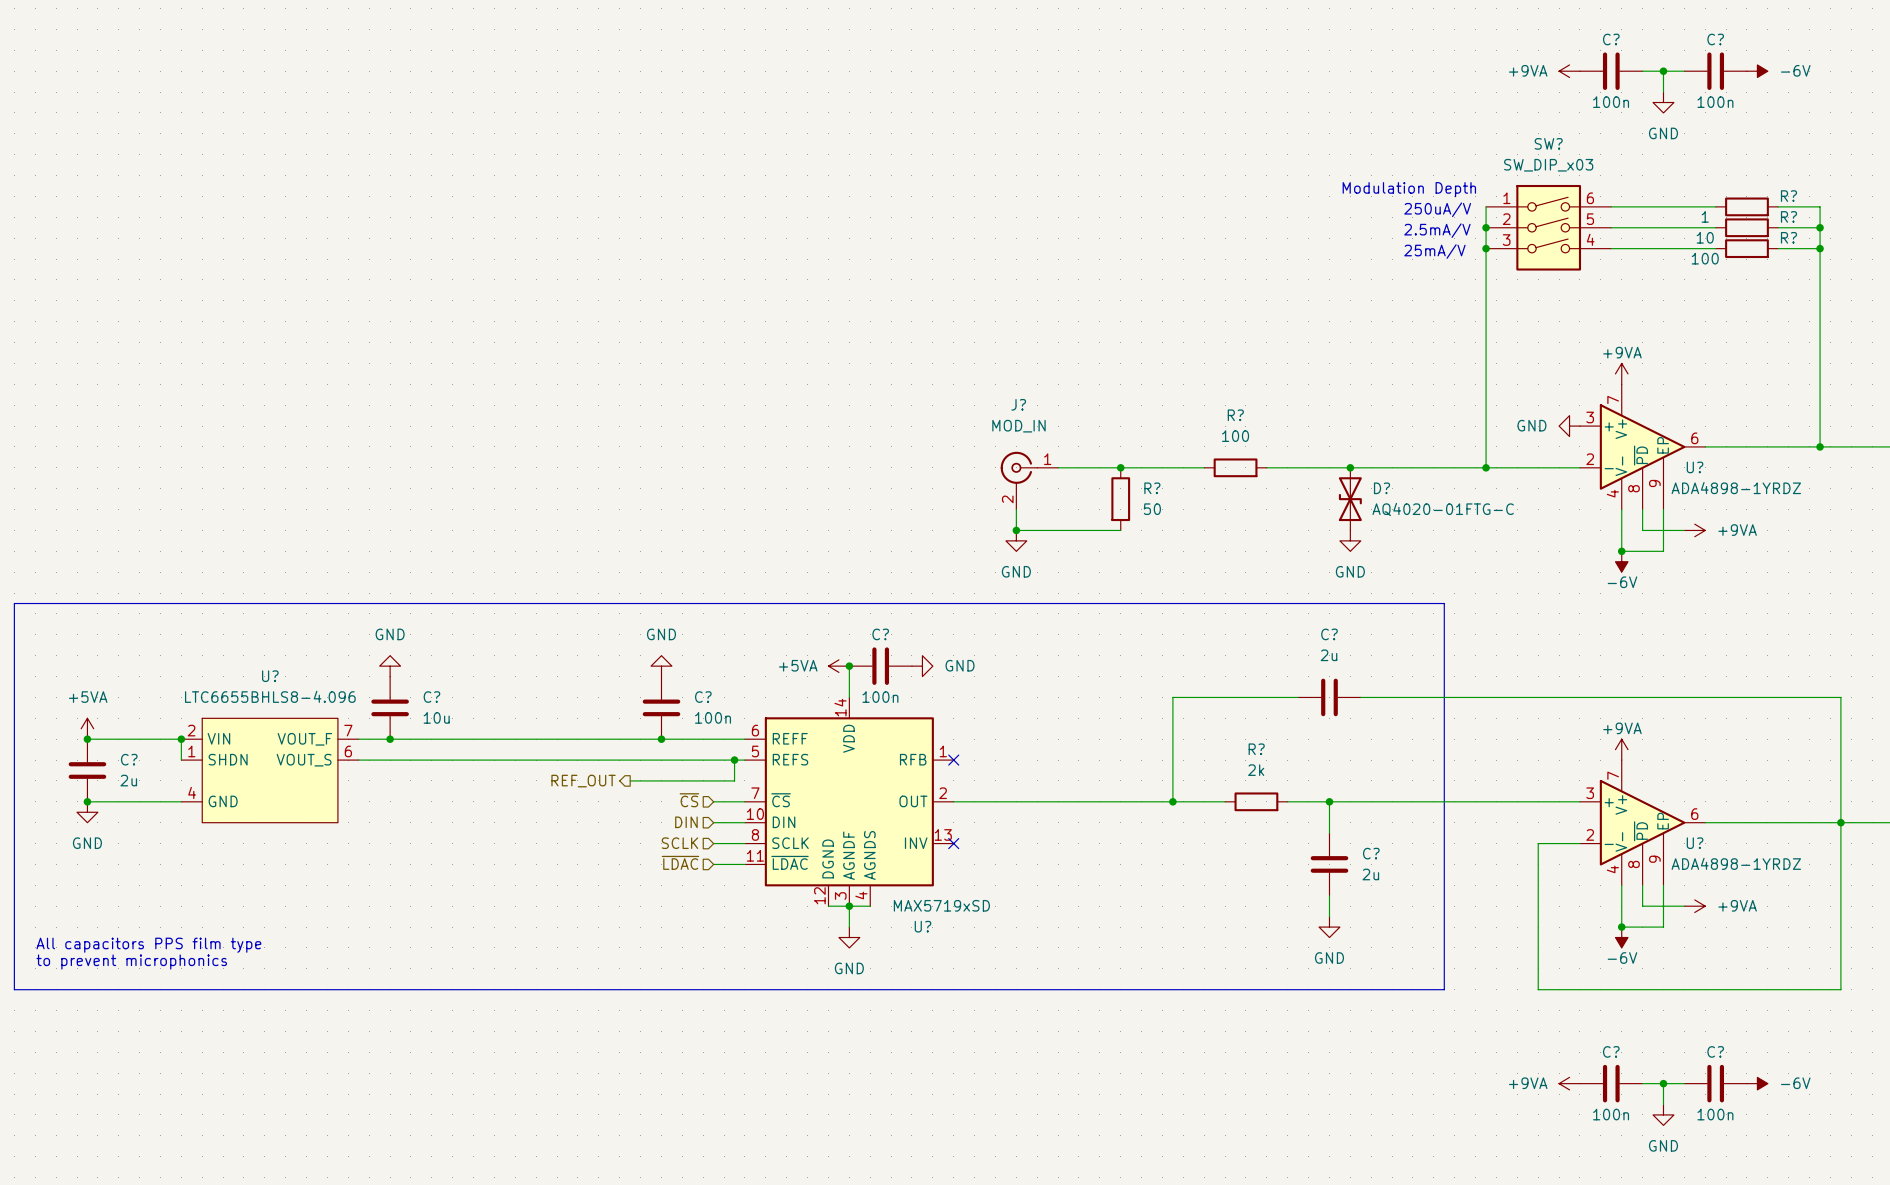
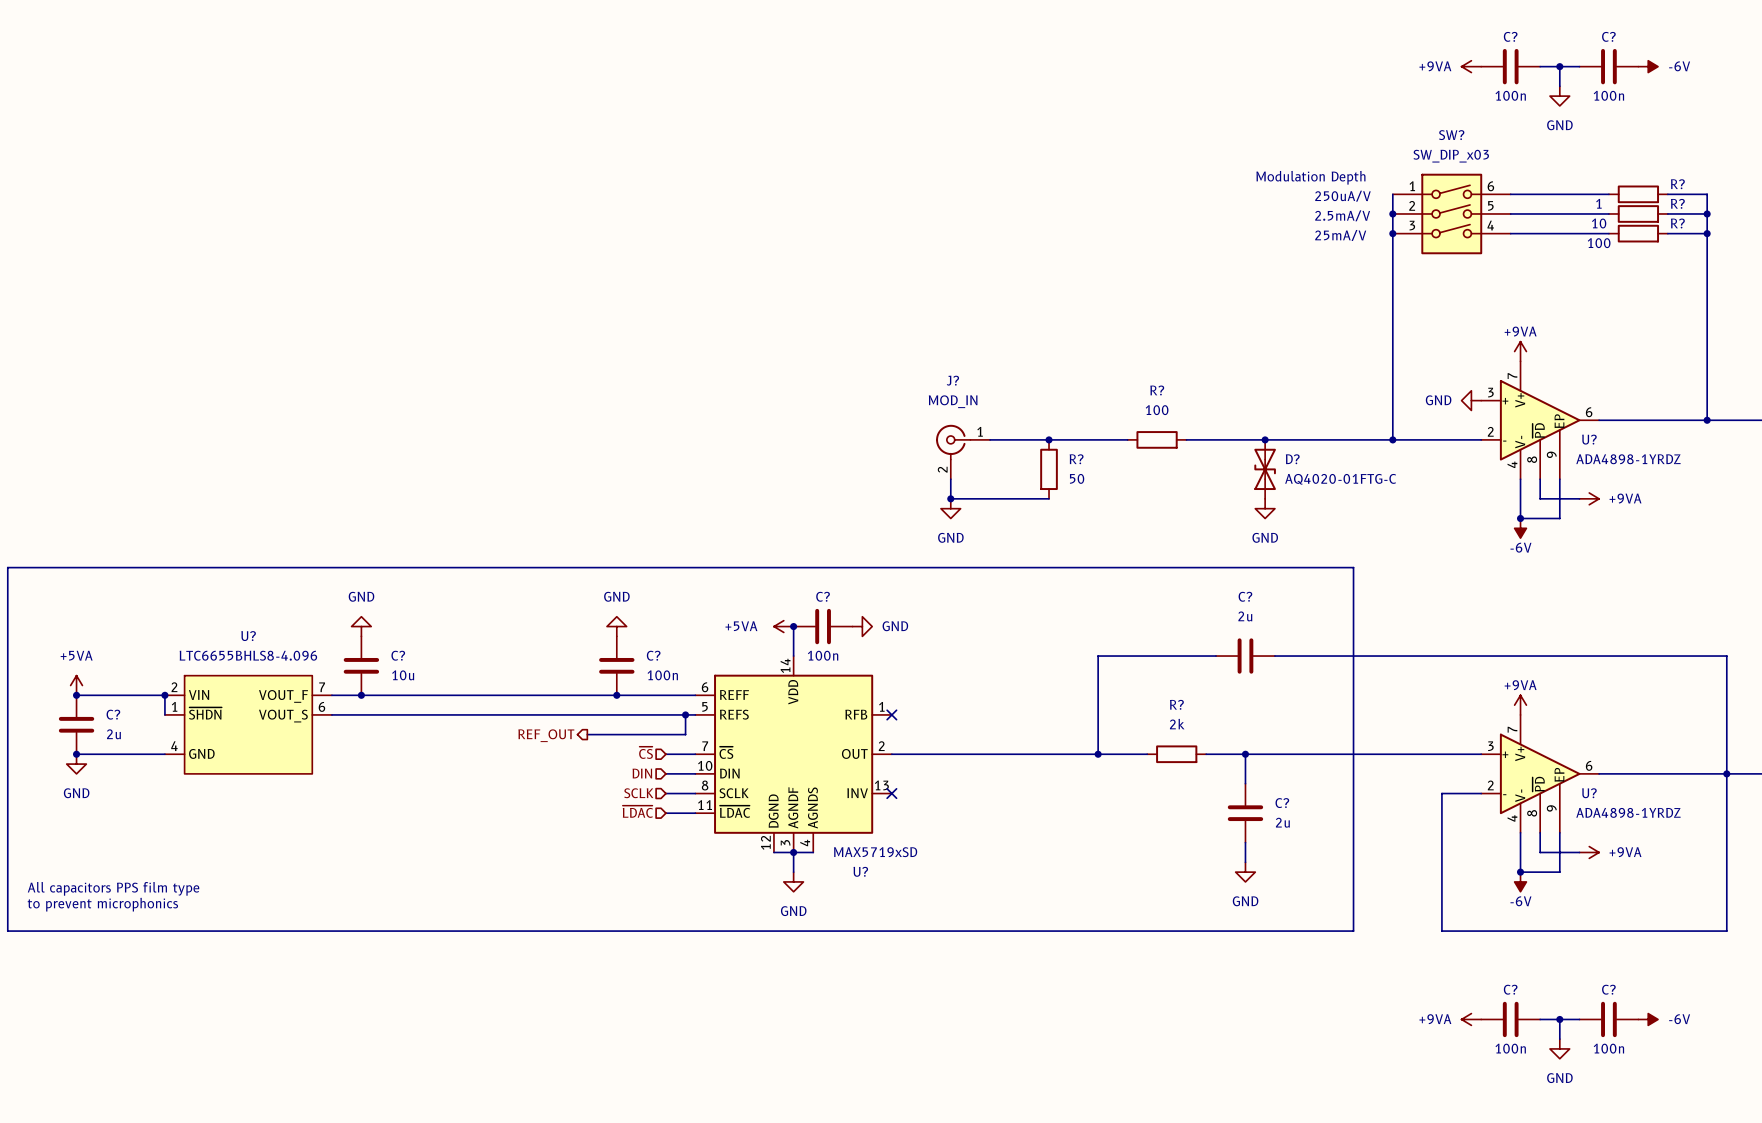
U? pin name: SHDN (228, 759) -> ~{SHDN} (205, 713)

